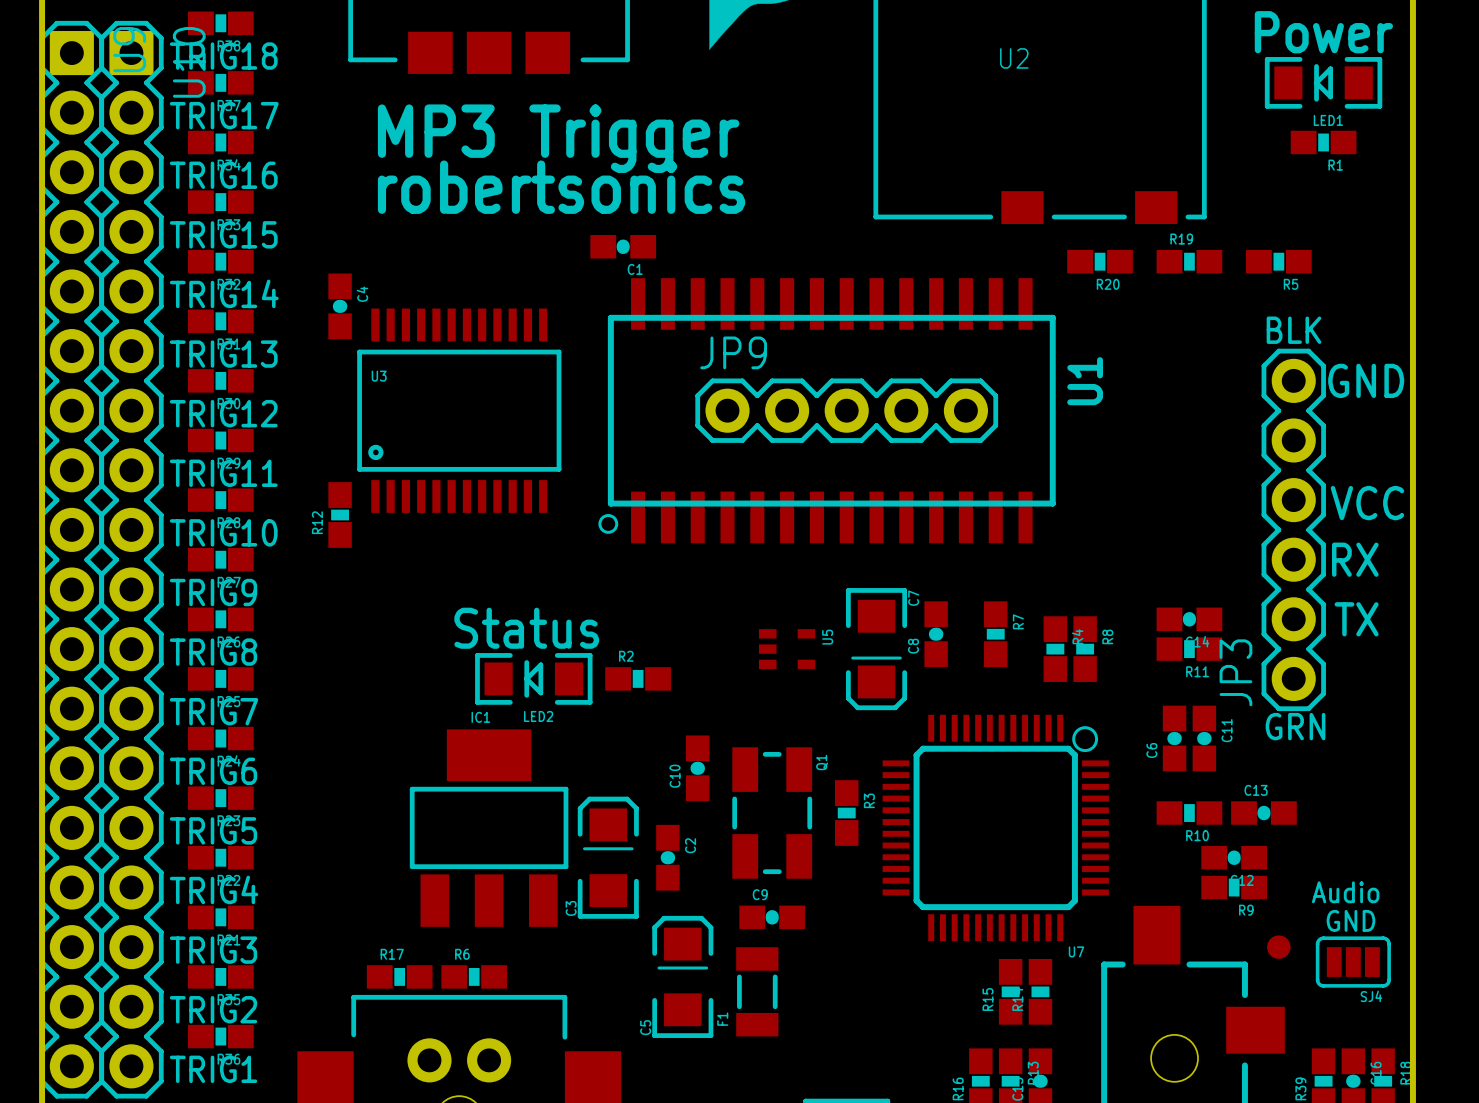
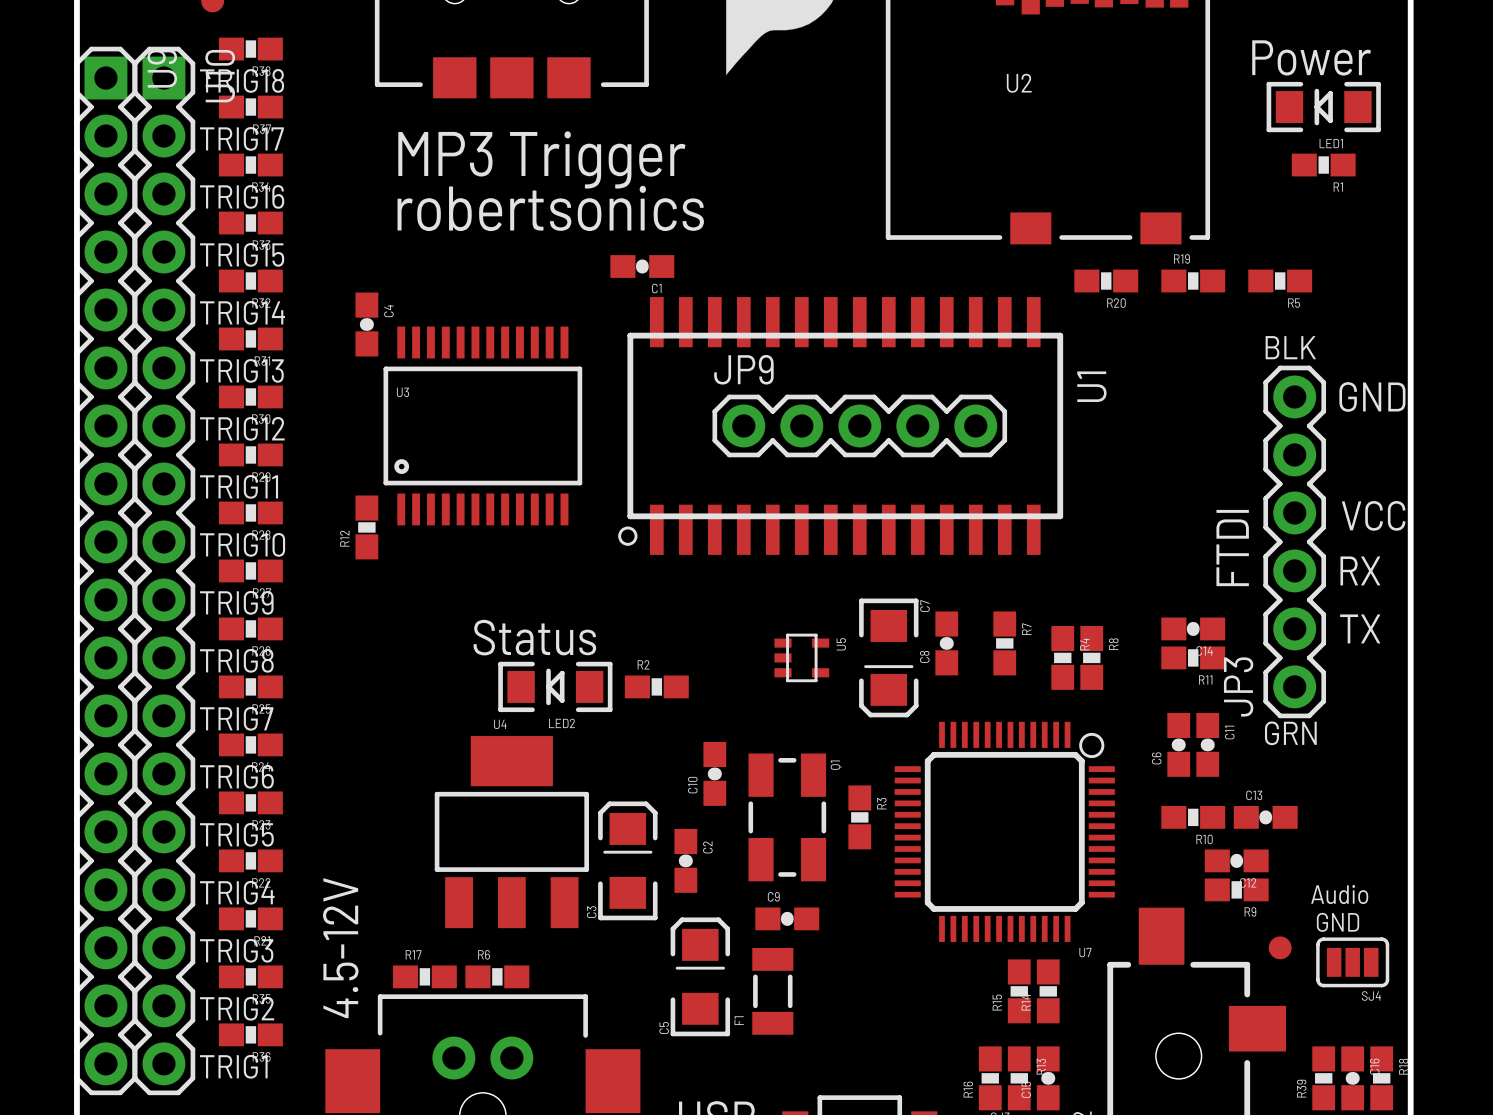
text: none -> FTDI (1232, 548)
U5 footprint: [758, 629, 816, 670] -> [774, 633, 830, 683]
IC1 name: IC1 (480, 717) -> U4 (500, 724)
text: none -> 4.5-12V (340, 948)

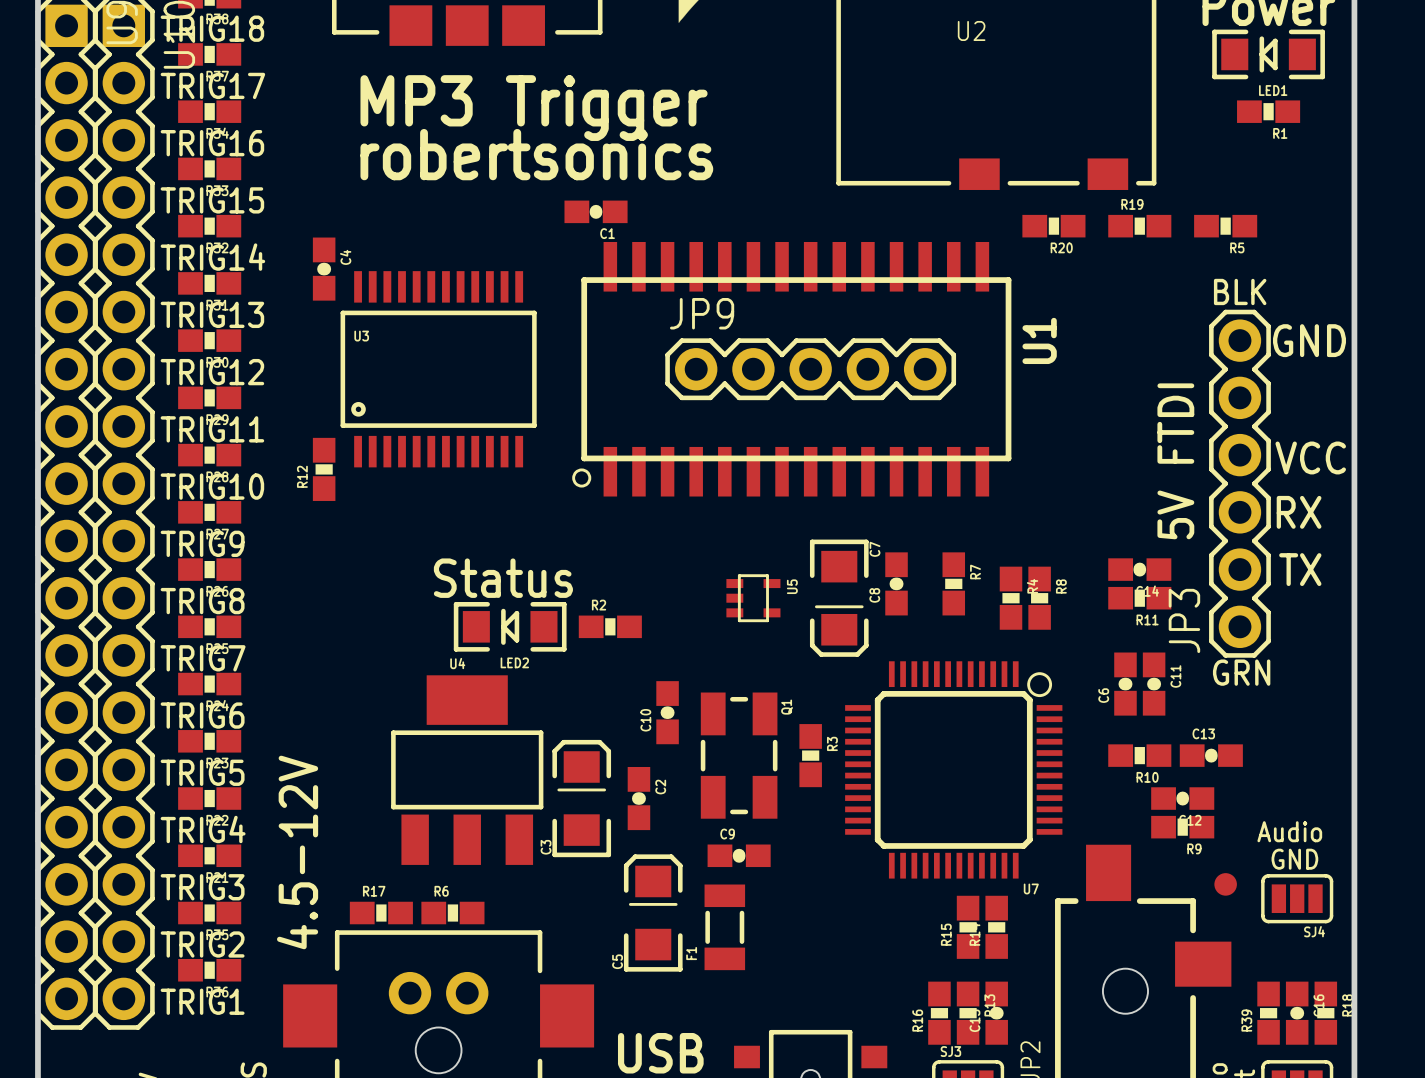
text: FTDI (1232, 548) -> 5V FTDI (1175, 461)

